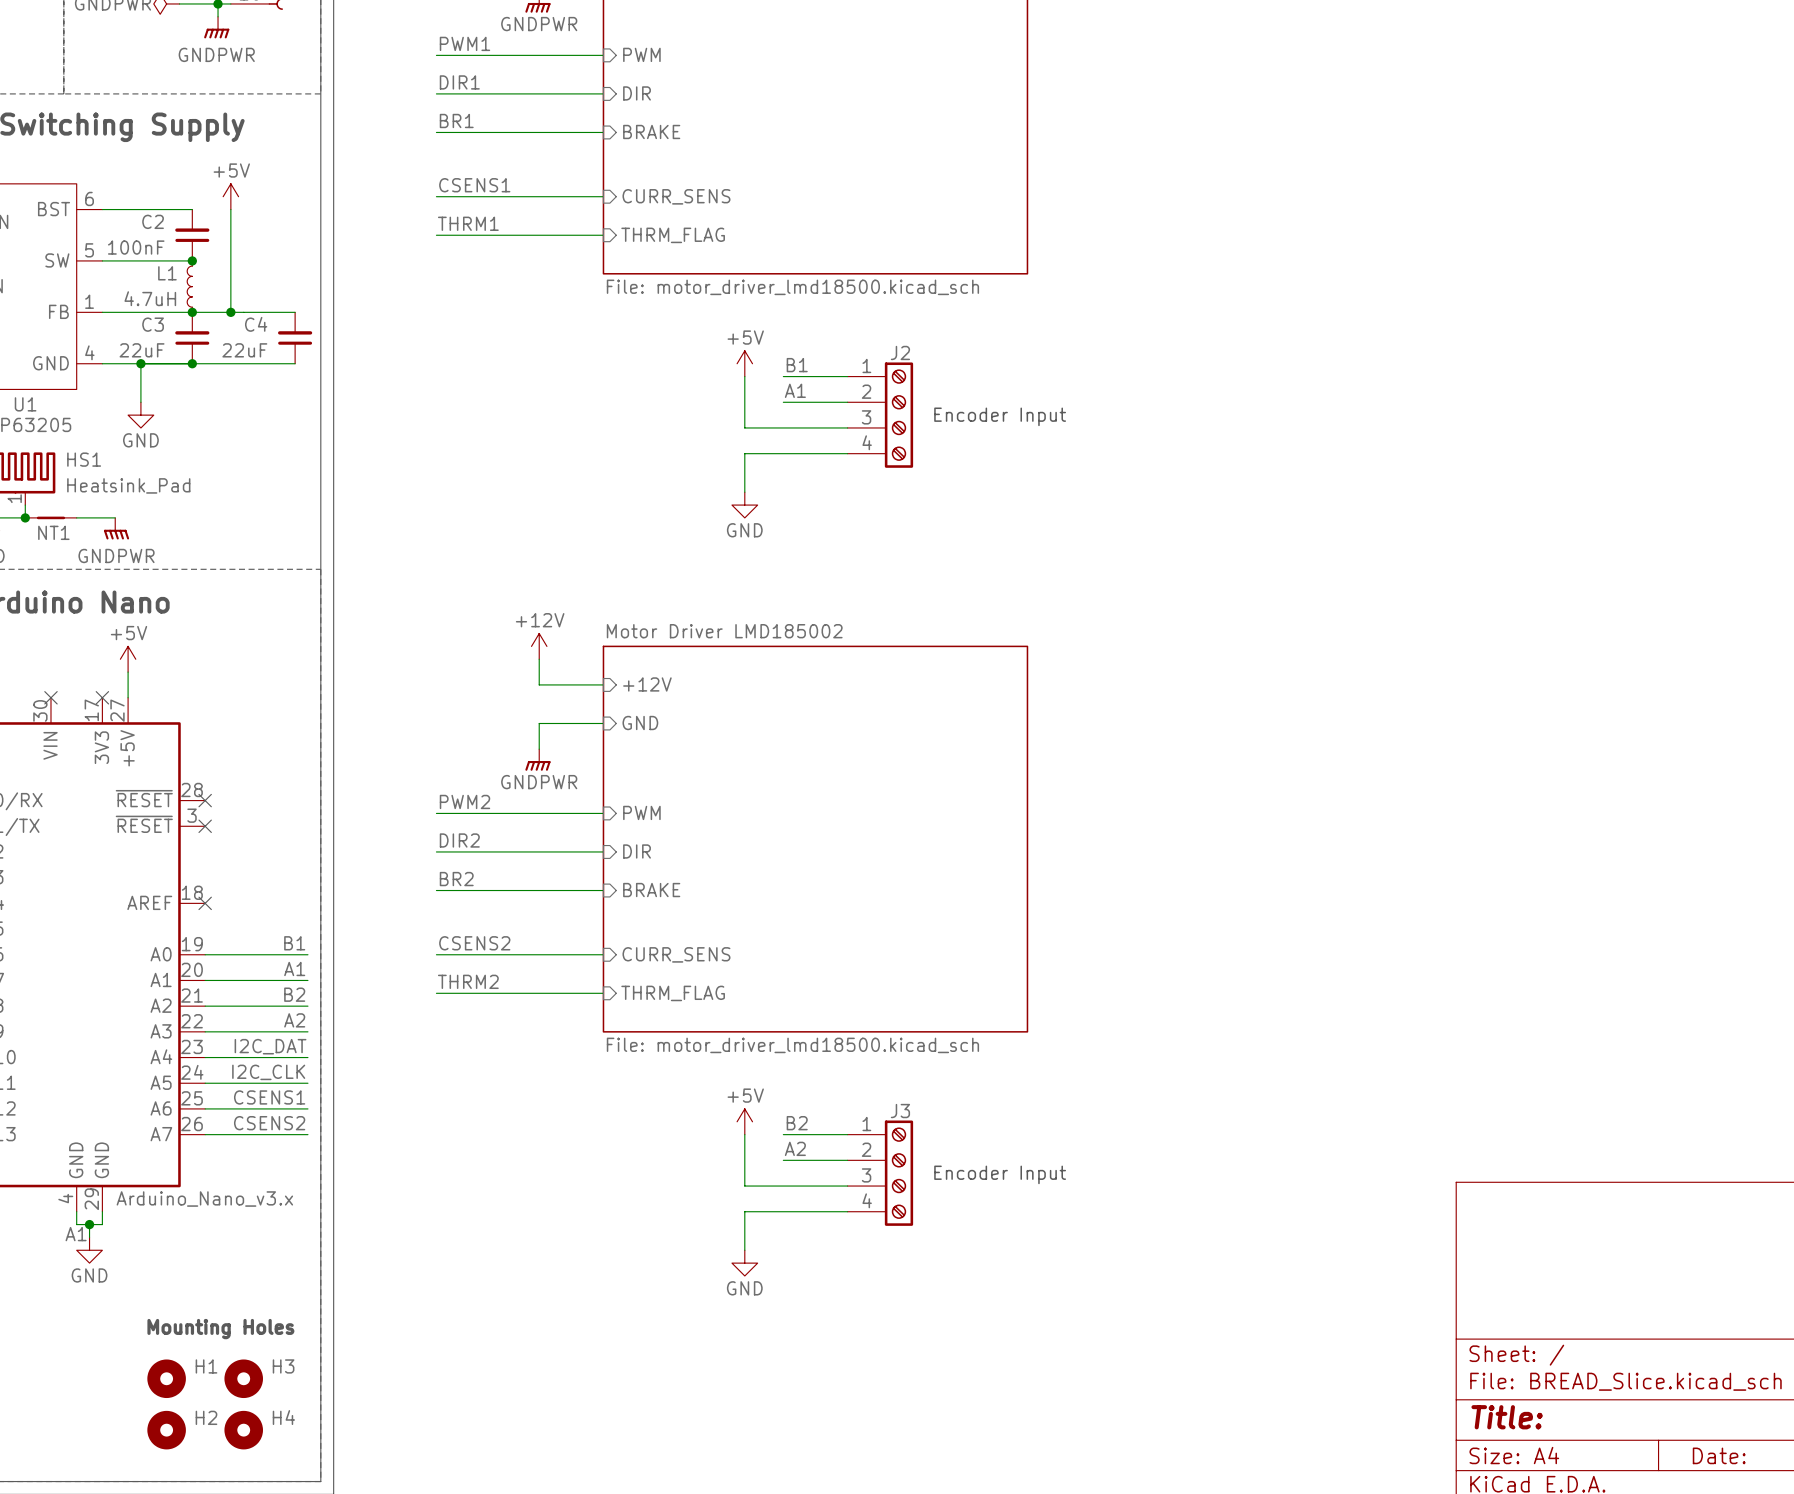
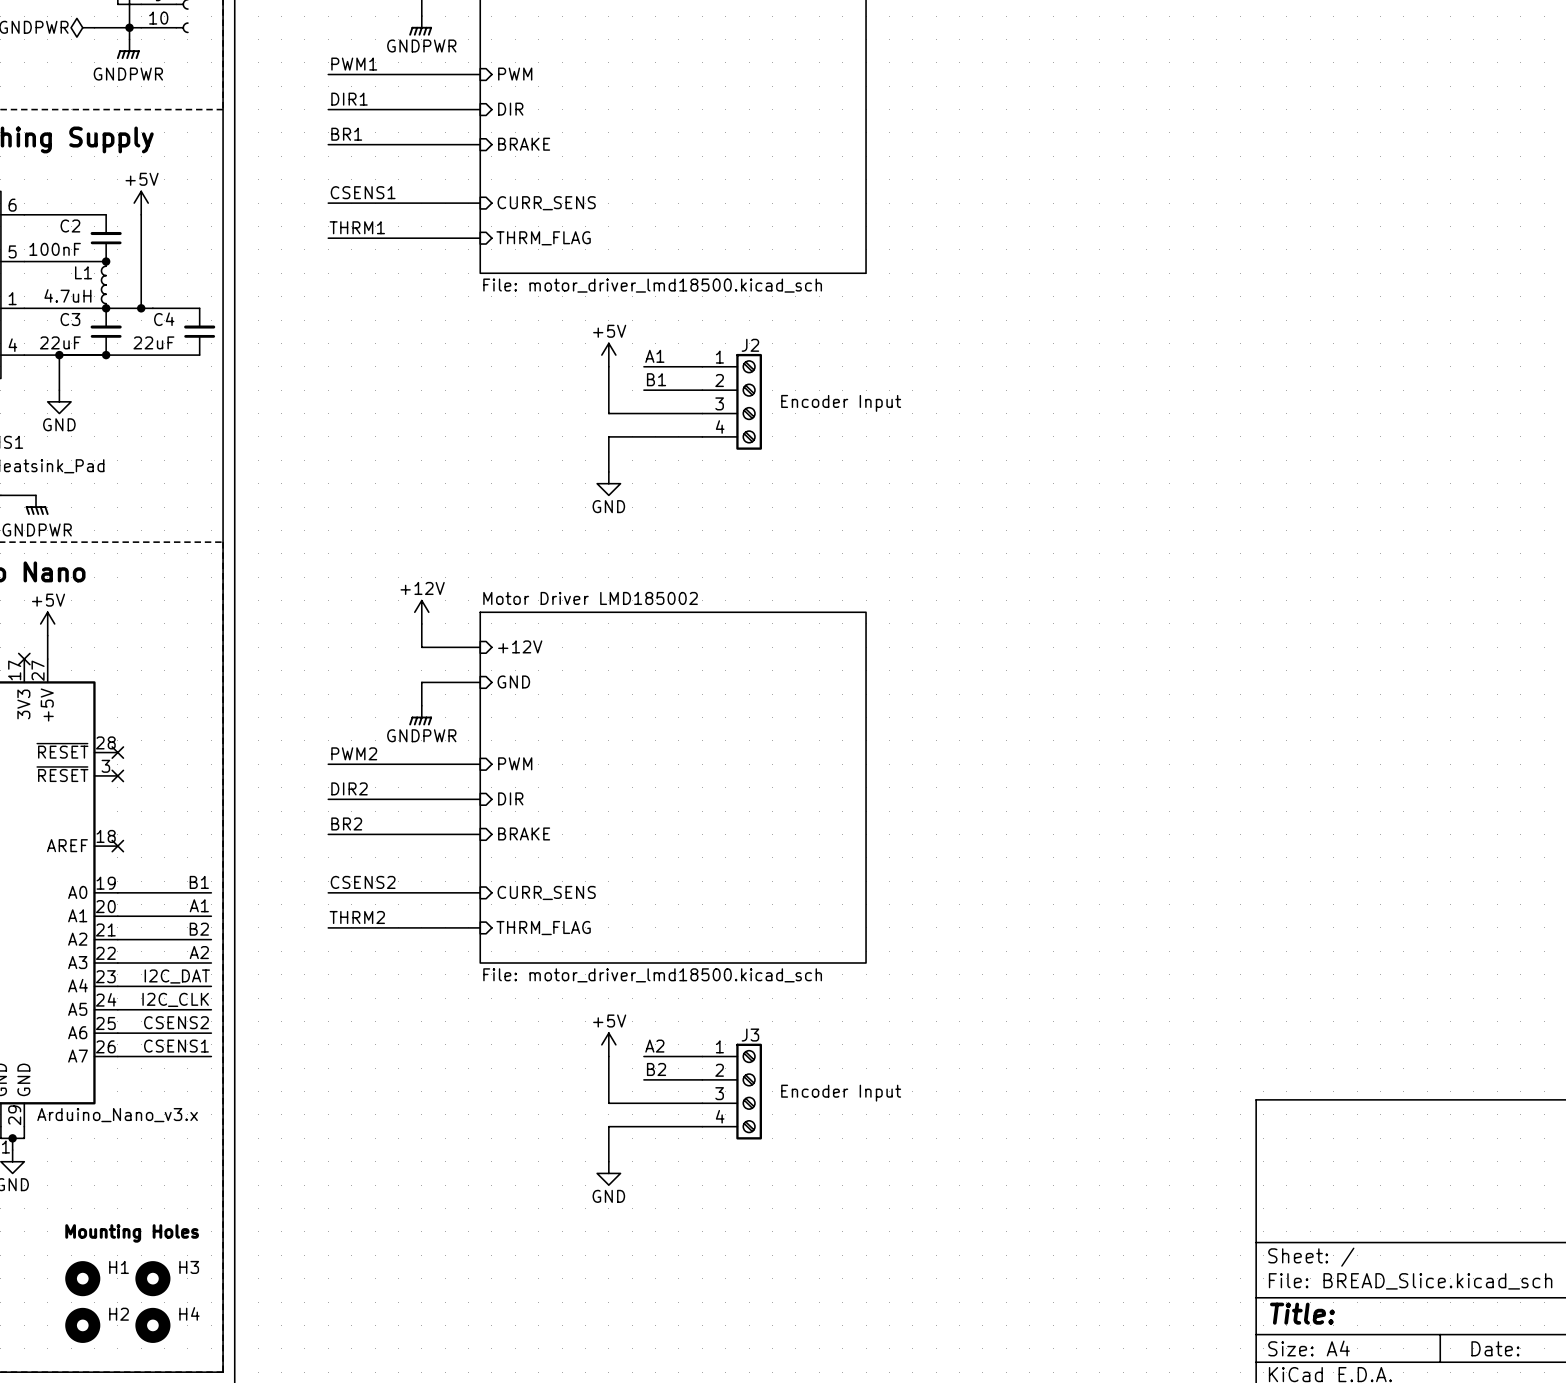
label: B1 (797, 365) -> A1 (654, 356)
label: A1 (795, 390) -> B1 (656, 379)
label: CSENS1 (269, 1097) -> CSENS2 (176, 1022)
label: CSENS2 (269, 1123) -> CSENS1 (176, 1046)
label: B2 (797, 1123) -> A2 (654, 1046)
label: A2 (795, 1148) -> B2 (656, 1069)

